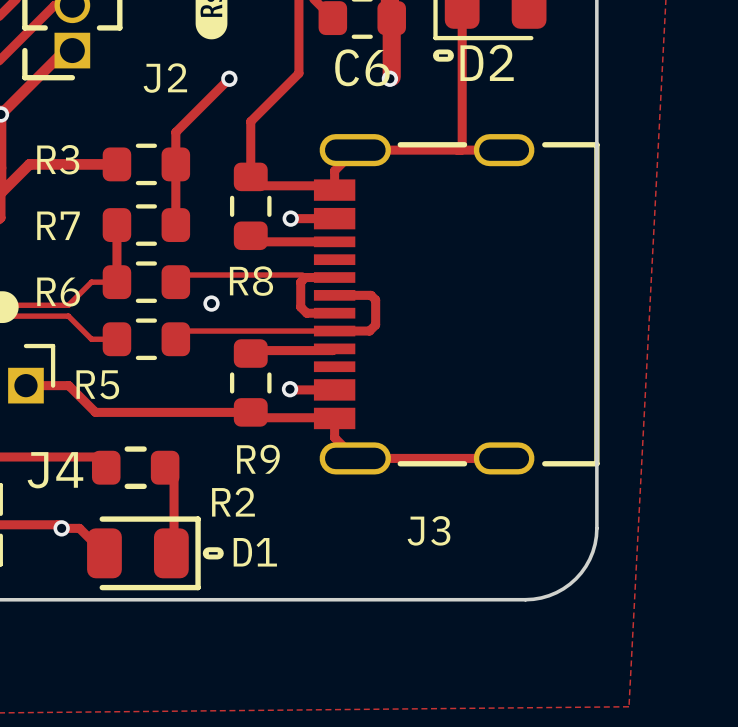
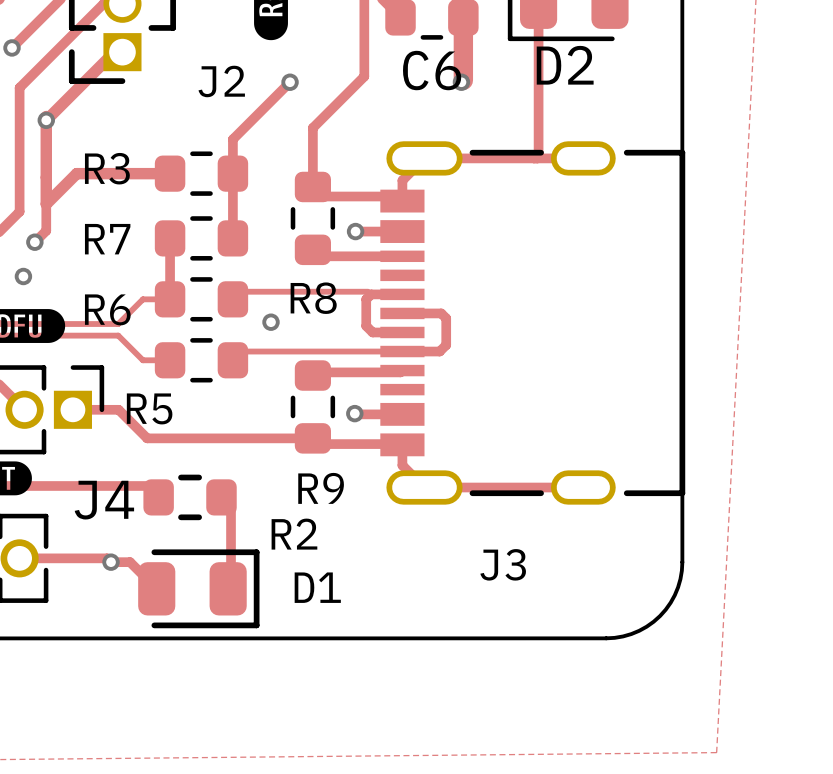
drawing: [432, 49, 454, 62] -> none
drawing: [202, 547, 224, 560] -> none

